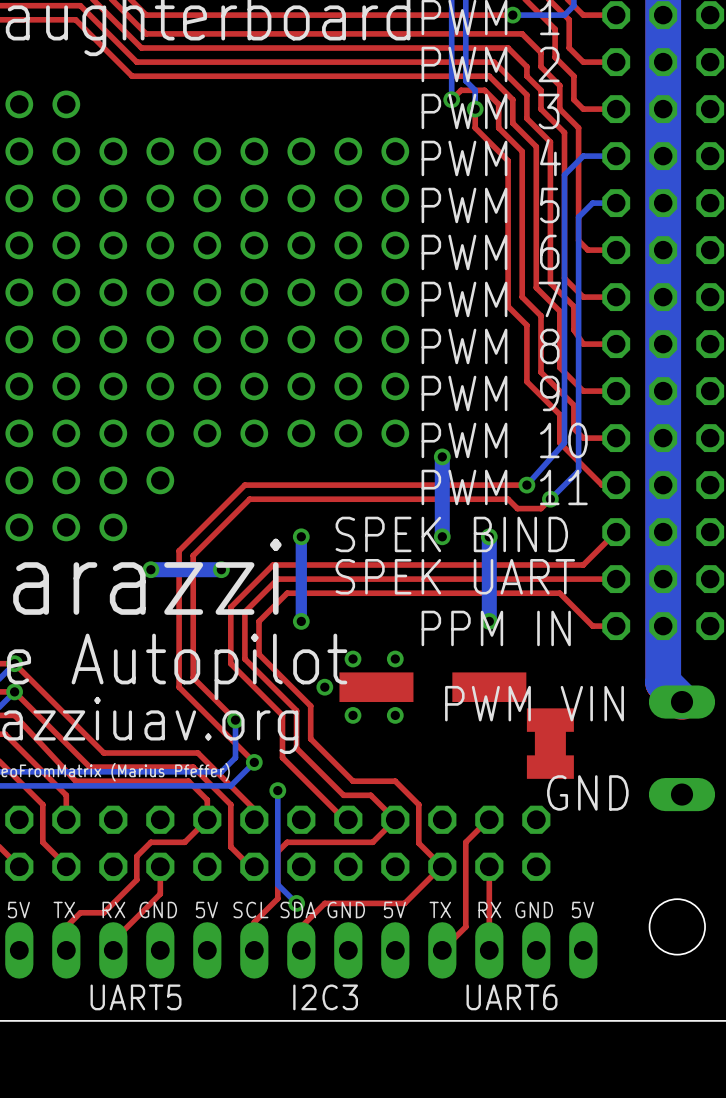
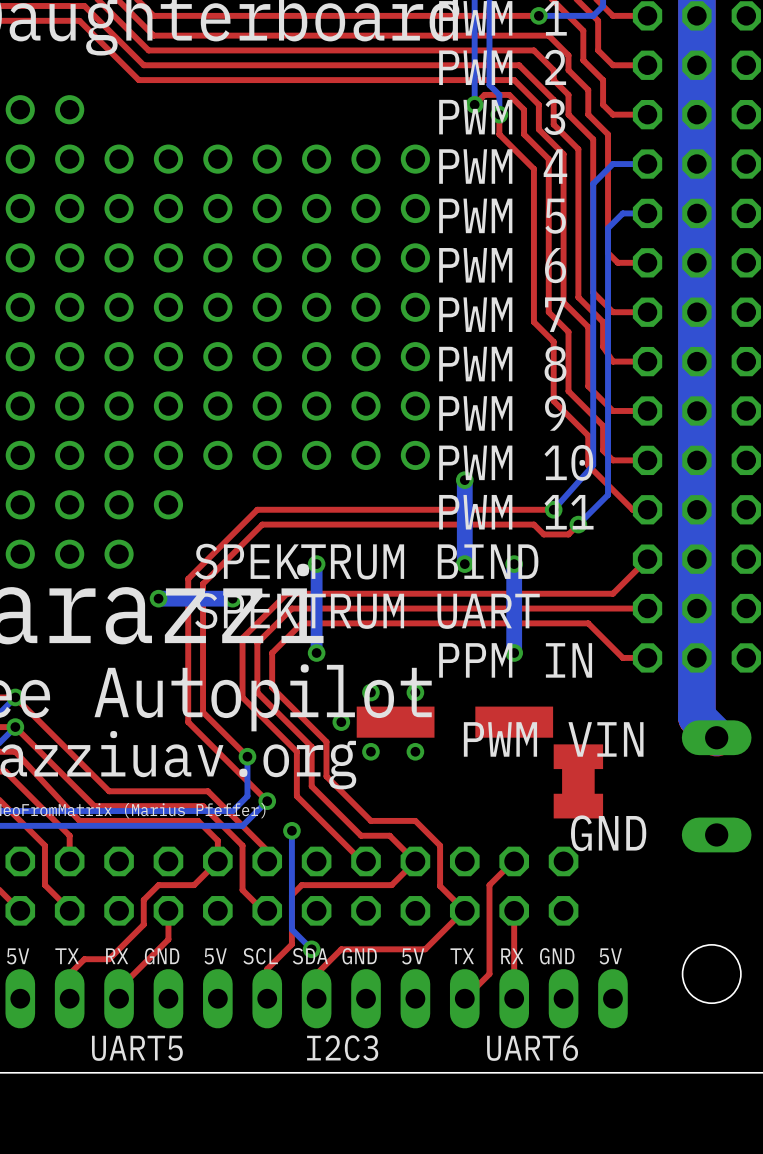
text: SPEK BIND (451, 534) -> SPEKTRUM BIND (366, 561)
text: SPEK UART (455, 576) -> SPEKTRUM UART (367, 611)

